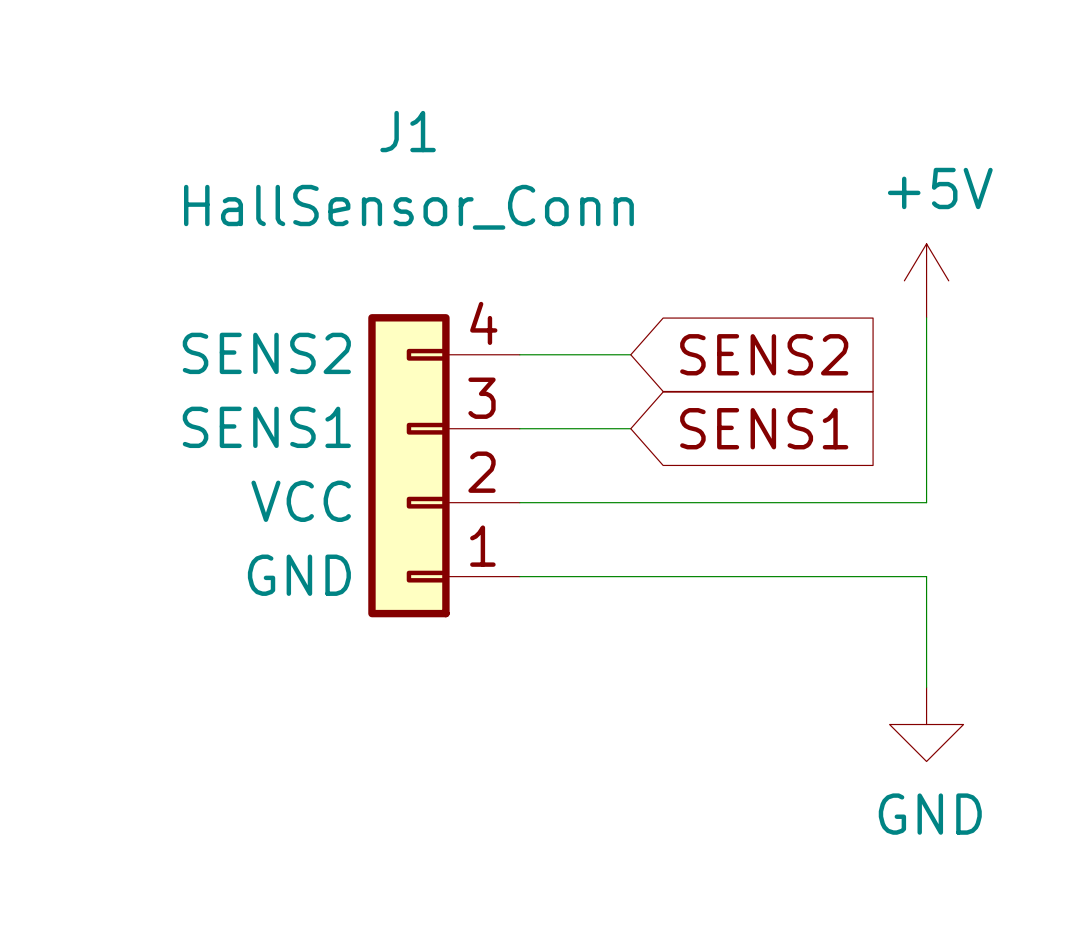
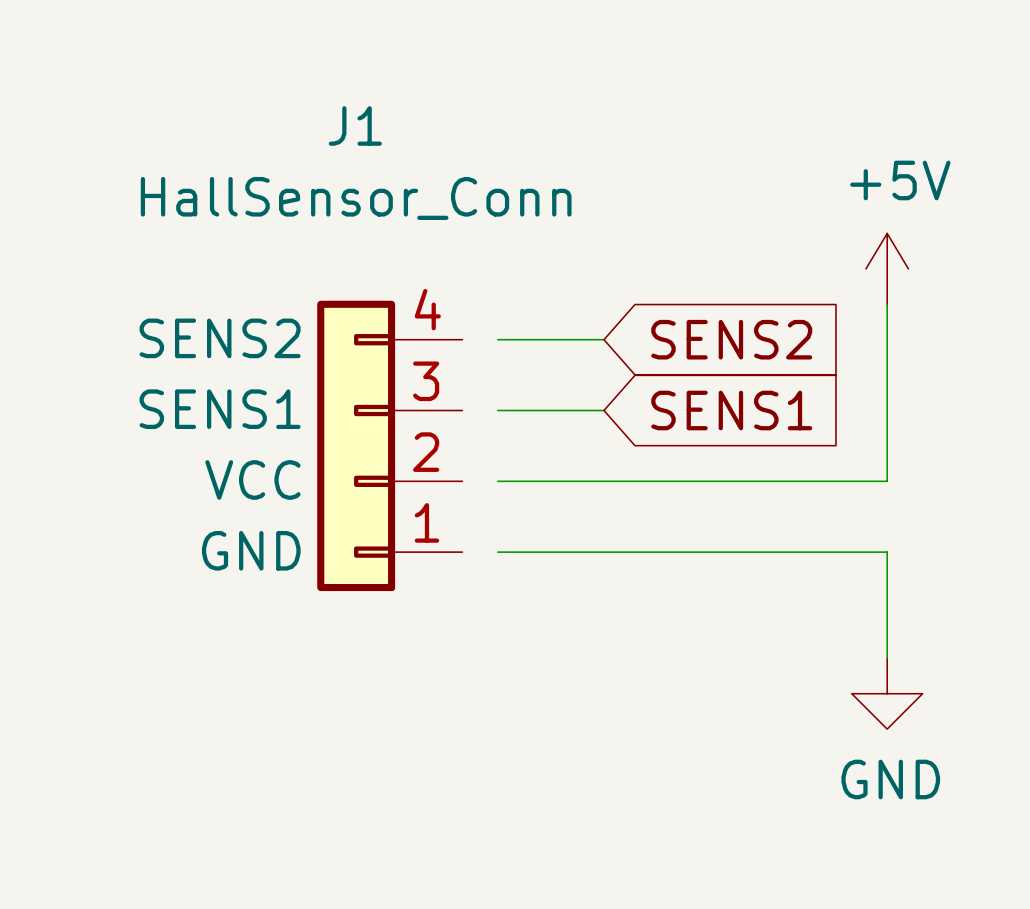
J1 position: (444, 465) -> (389, 445)

